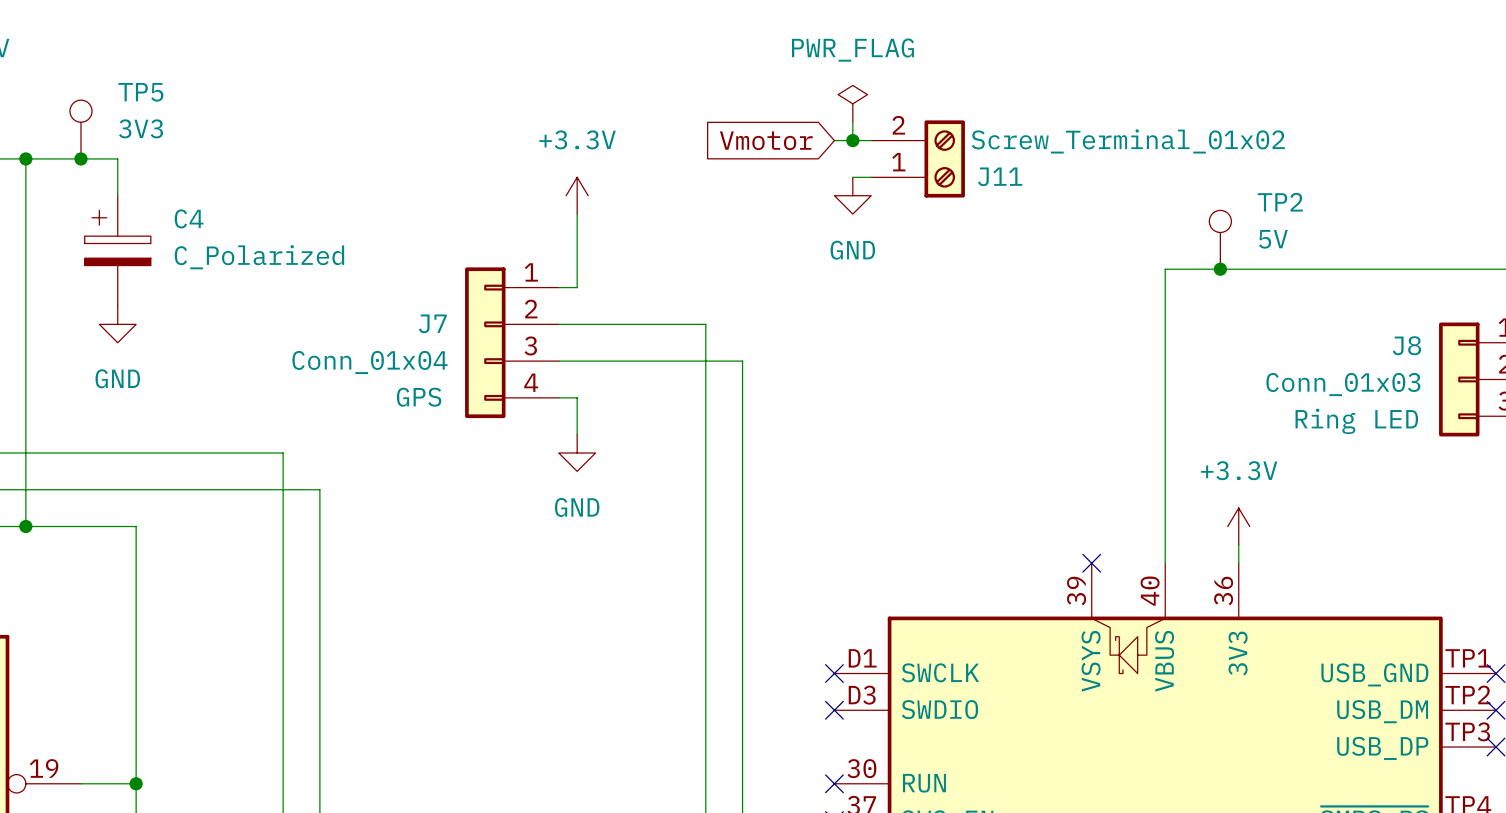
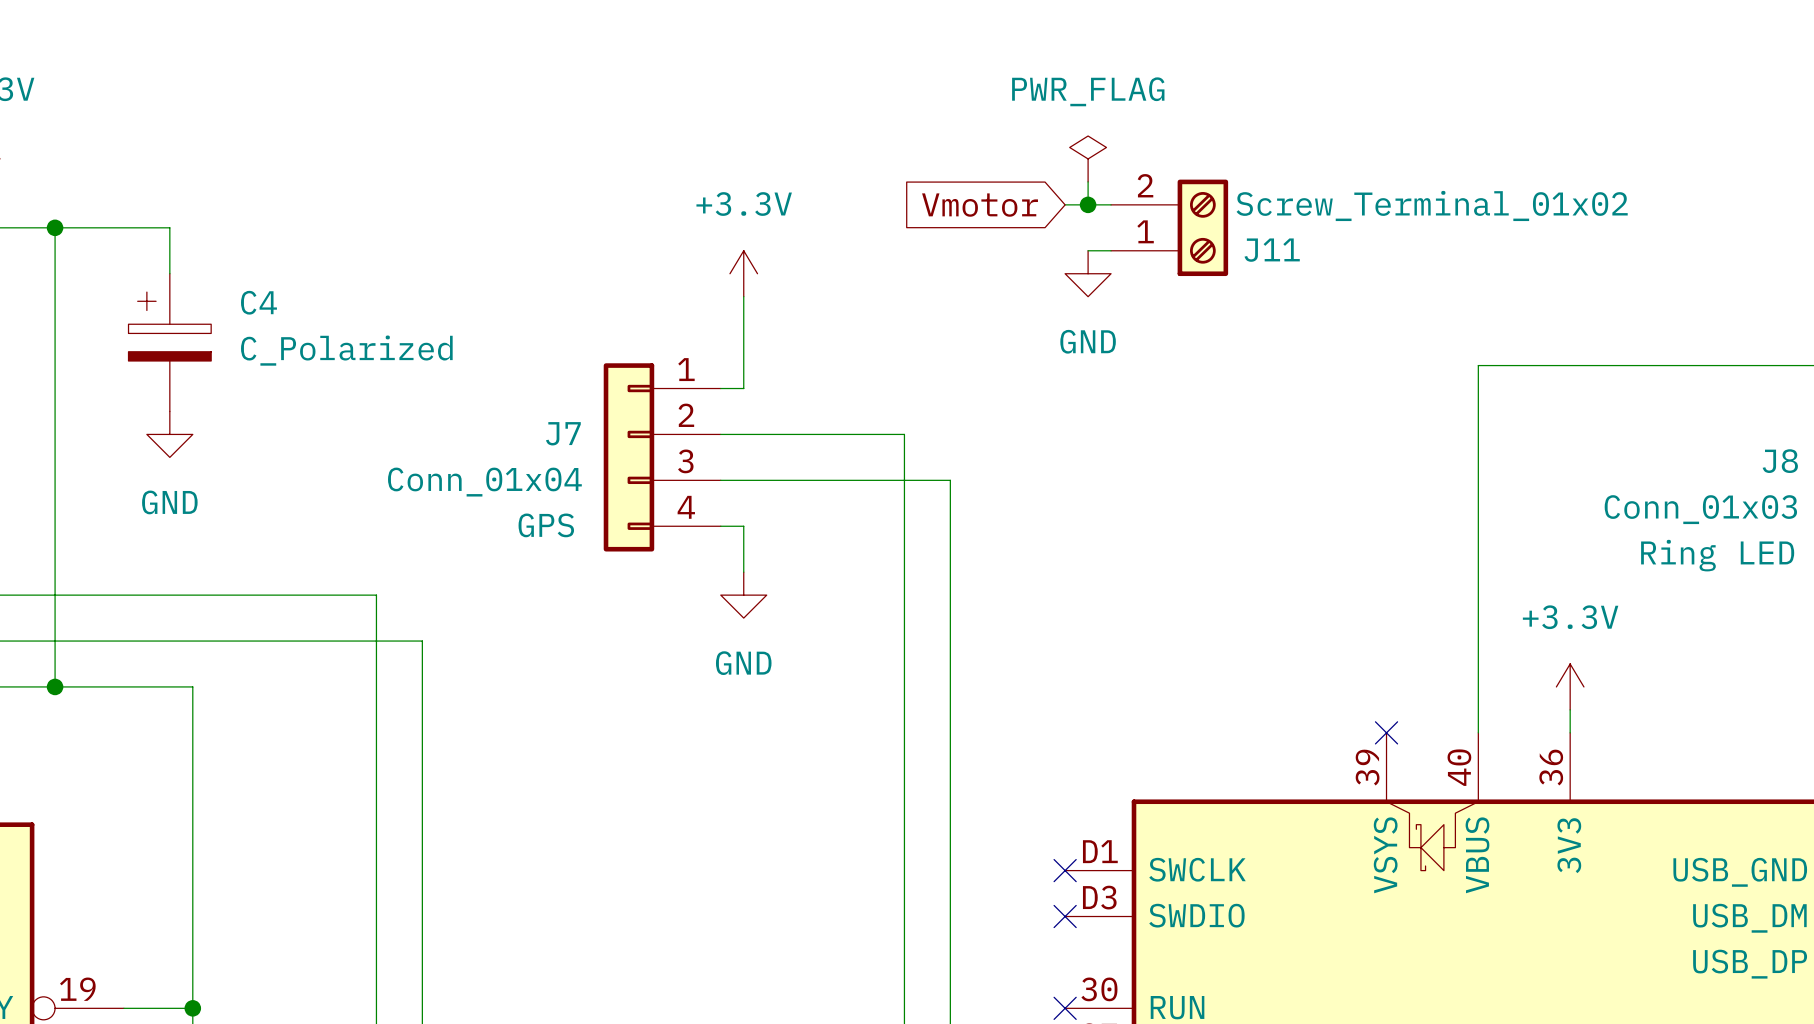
TP5: 3V3 (80, 129) -> none
junction: (80, 158) -> none
TP2: 5V (1220, 239) -> none
junction: (1220, 269) -> none

